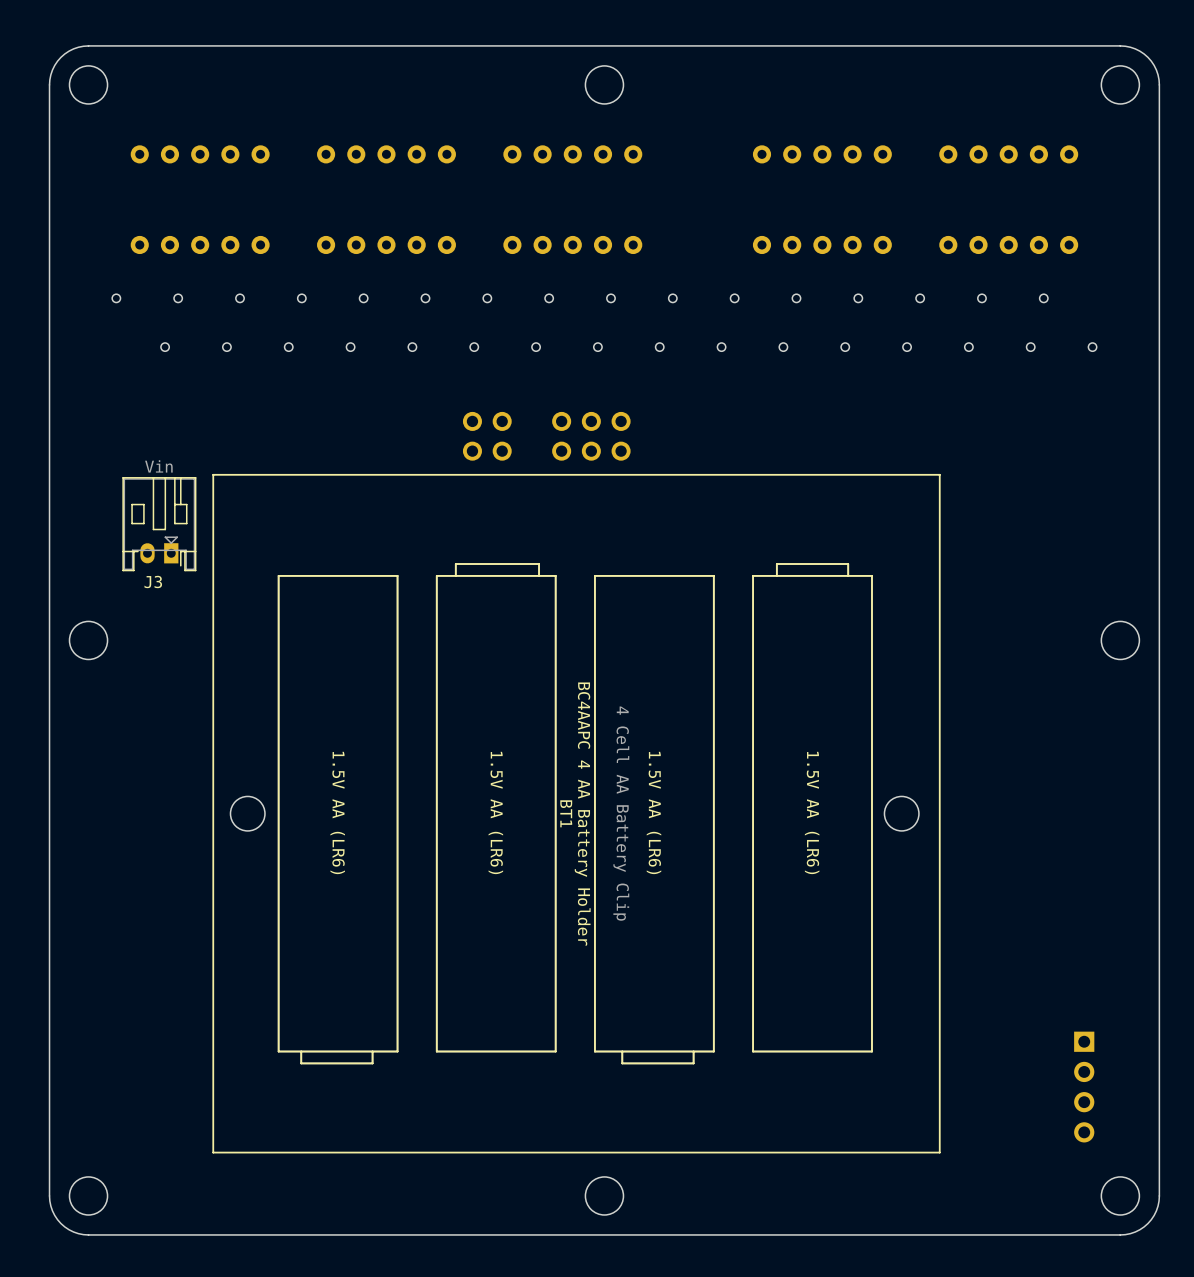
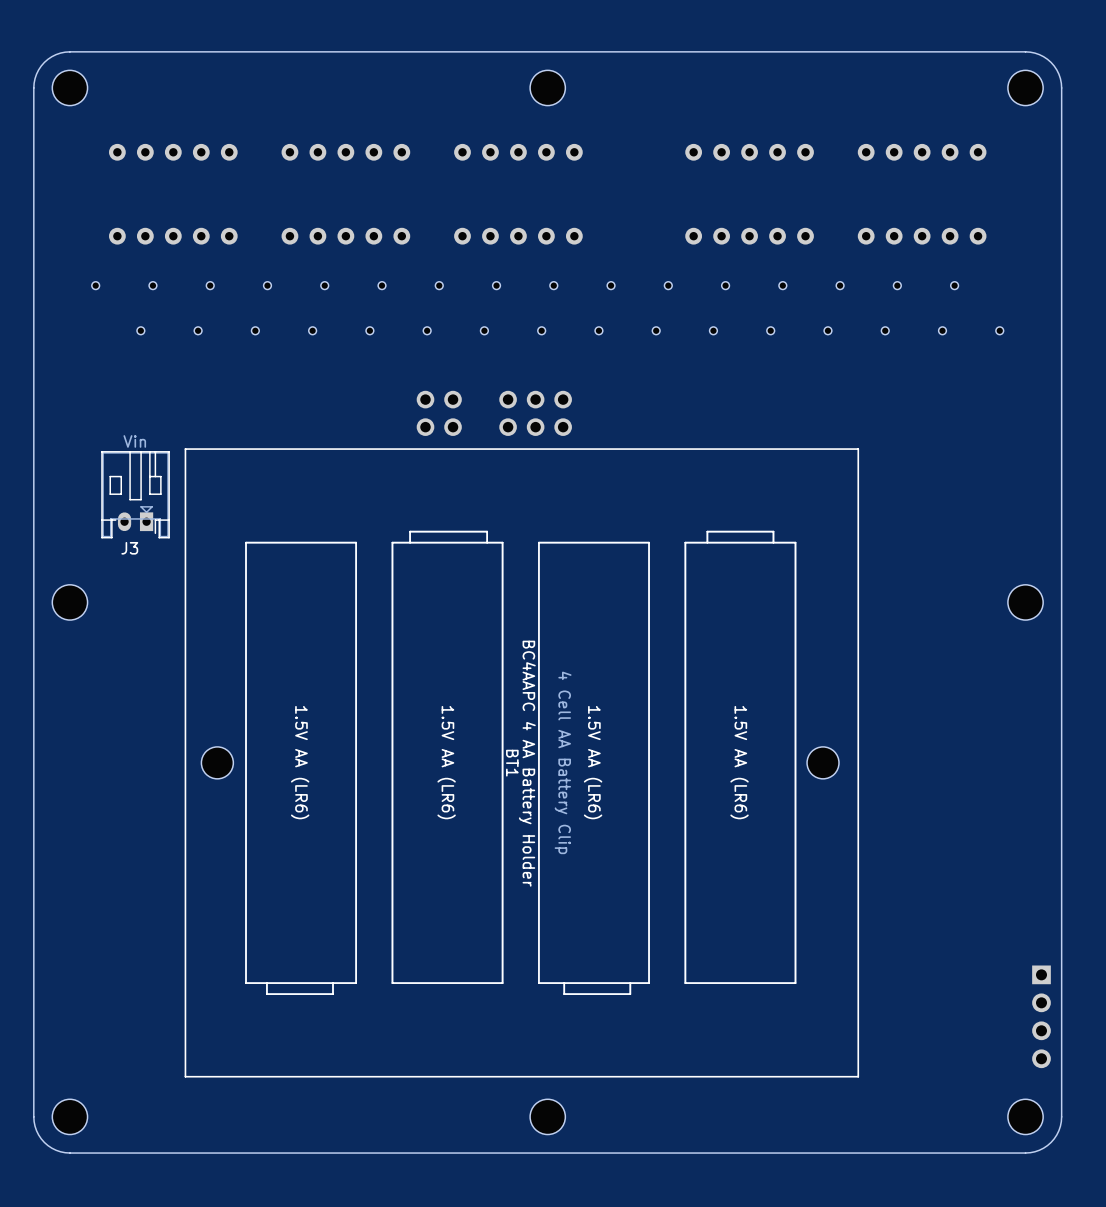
part position: (1084, 1087) -> (1041, 1016)

